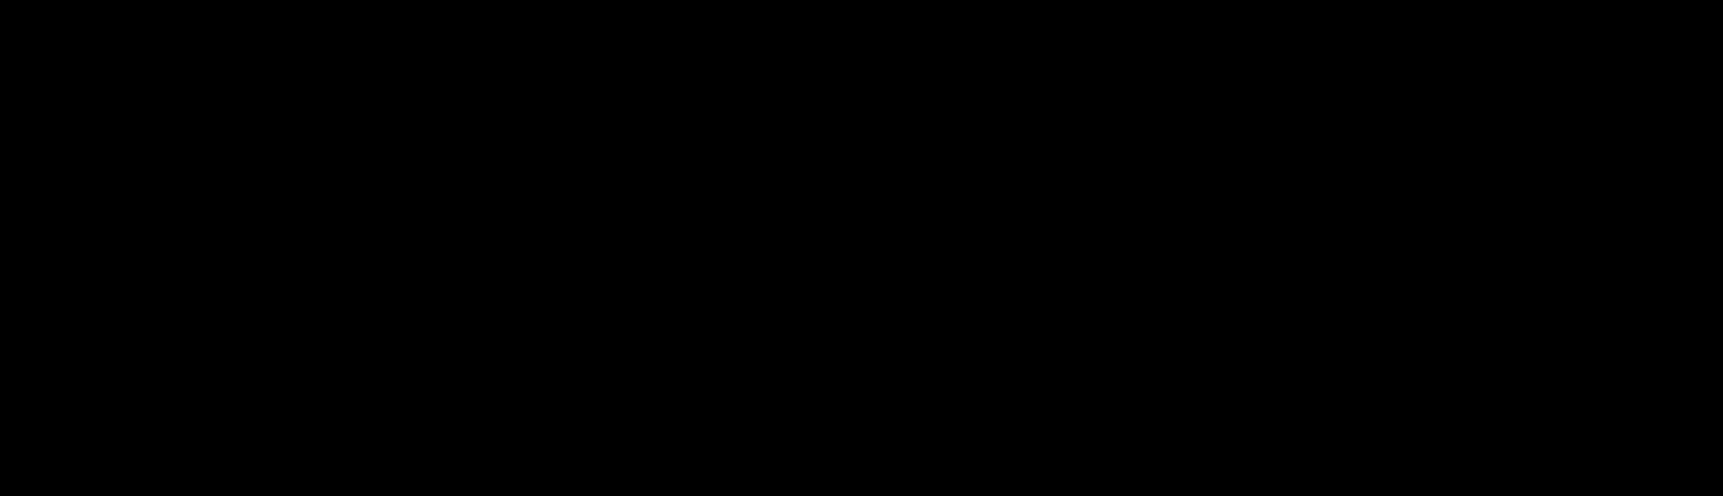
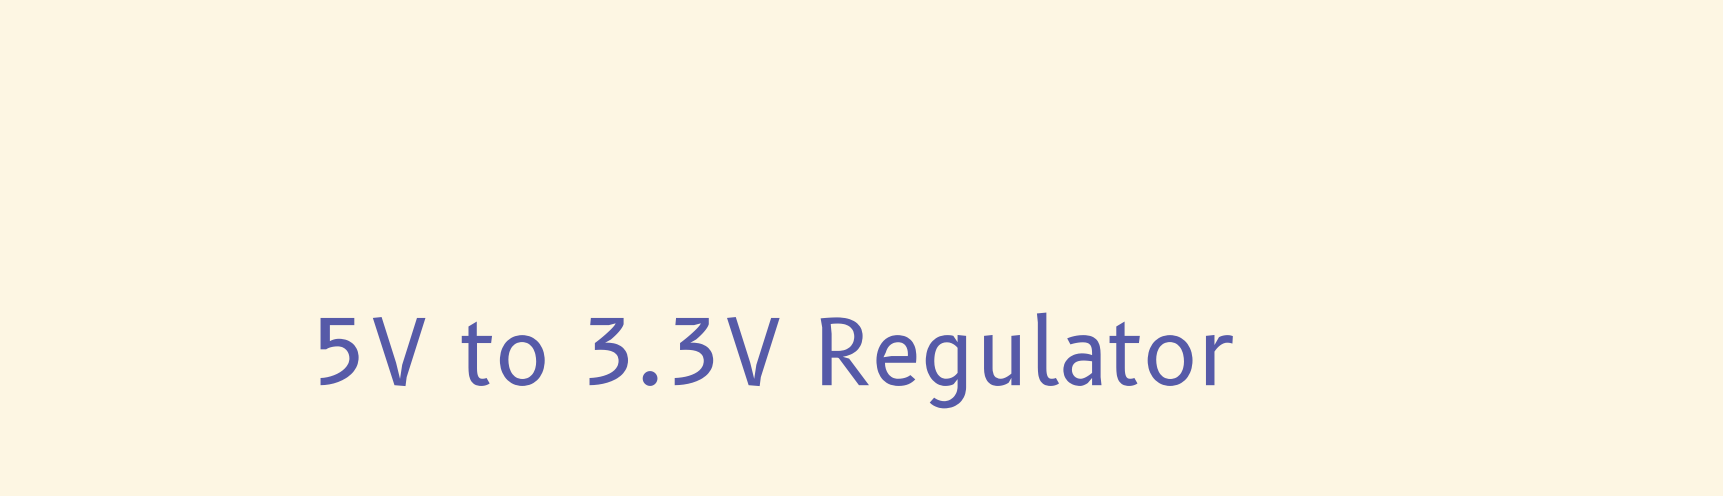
text: none -> 5V to 3.3V Regulator (776, 360)

